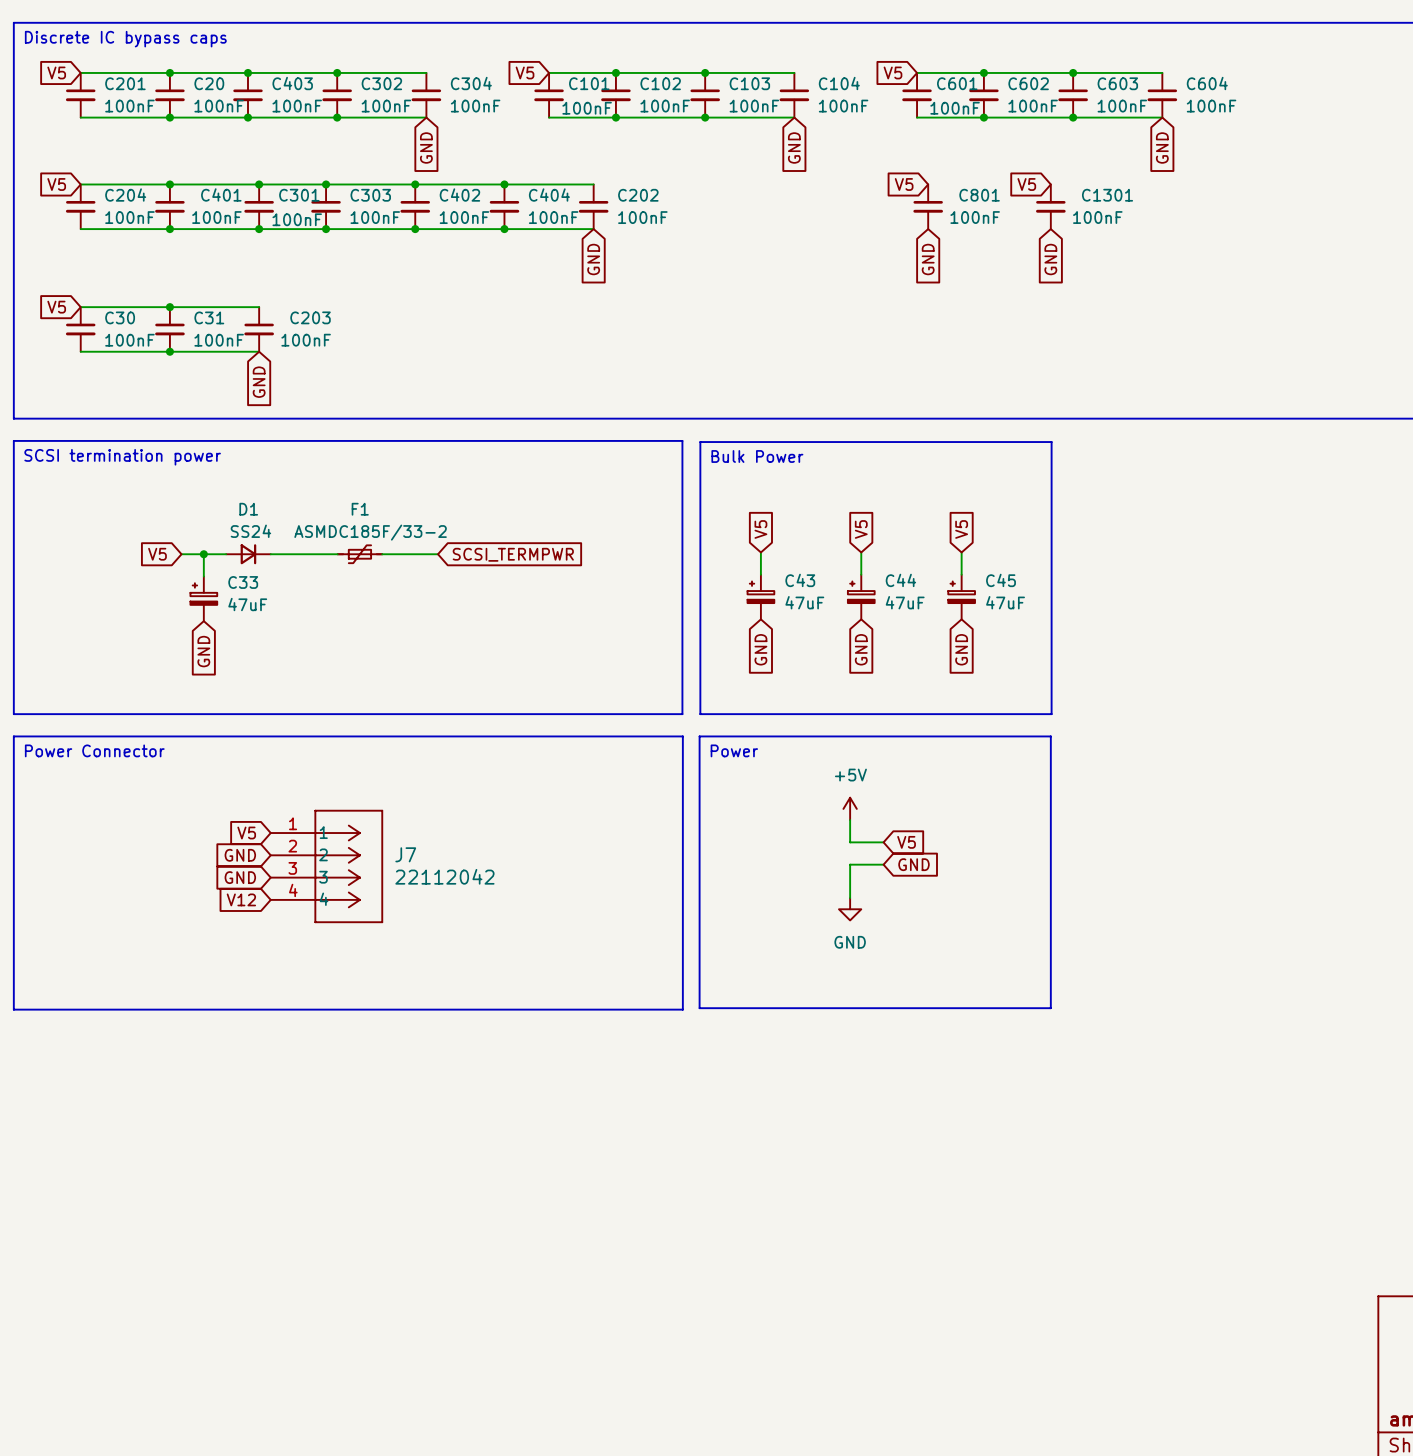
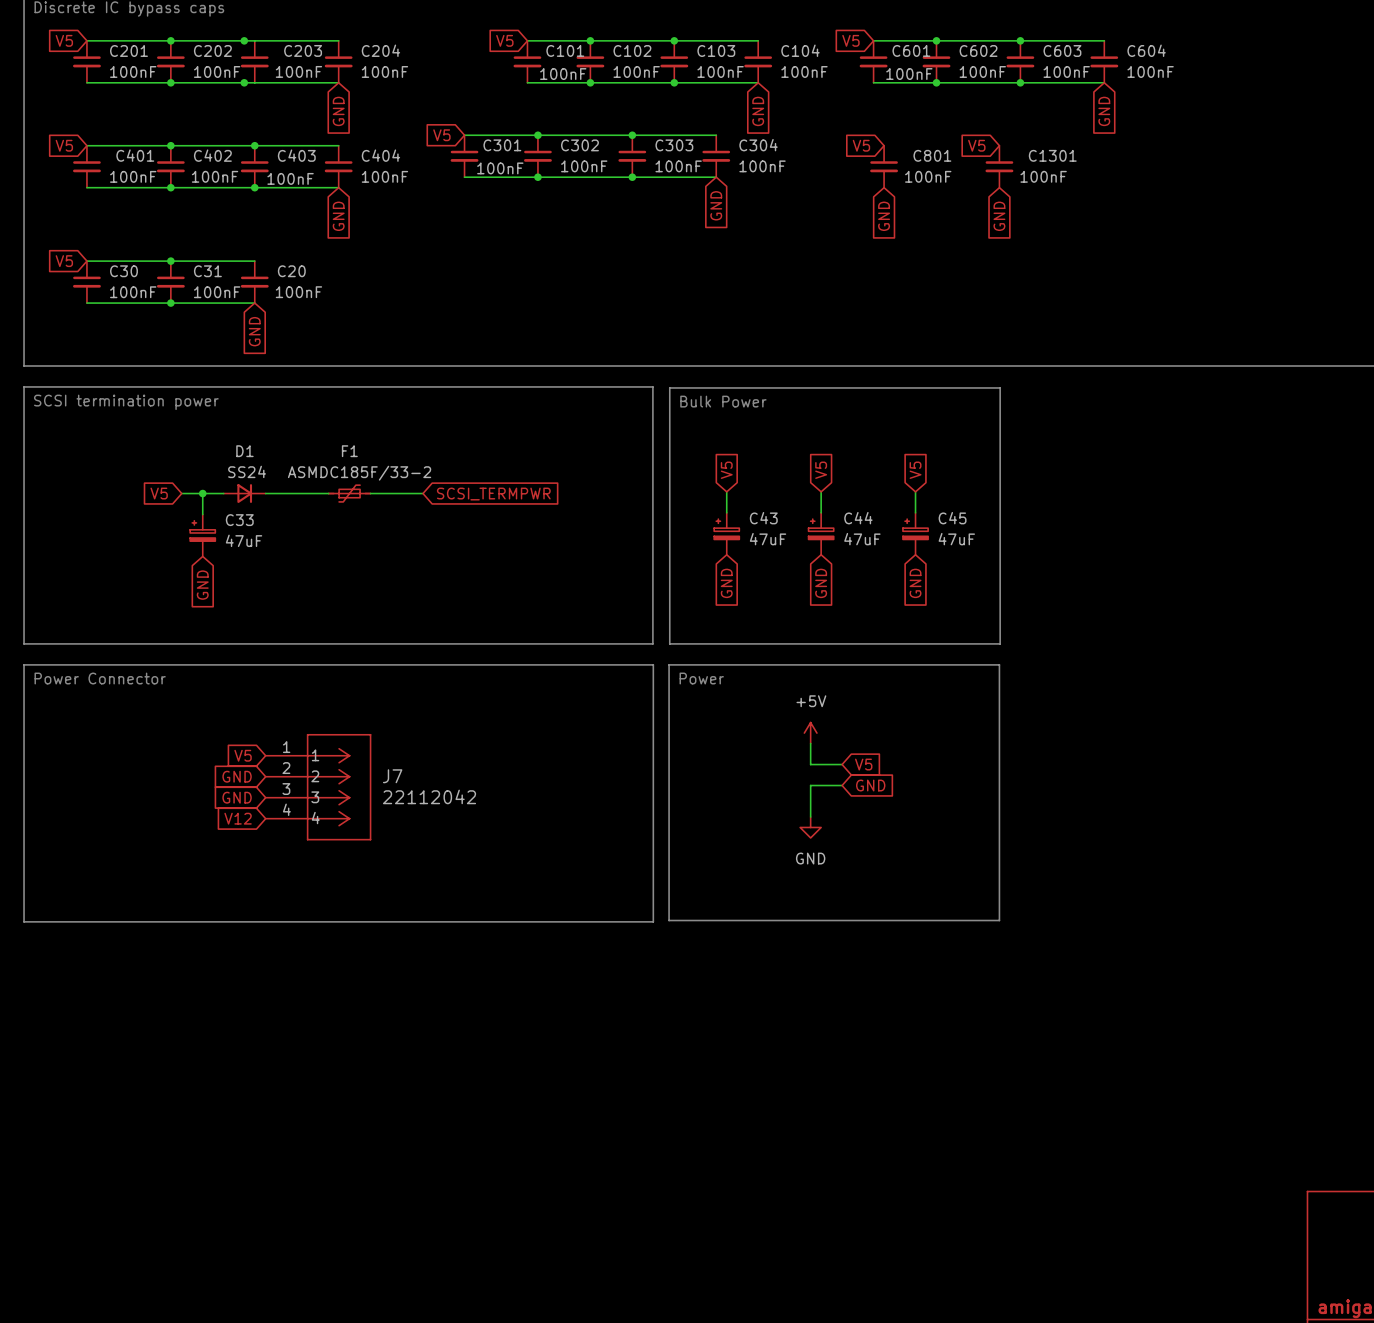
junction: (337, 72) -> none
wire: (348, 72) (426, 72) -> none
C20 name: C20 (209, 83) -> C202 (212, 51)
C403: 100nF (247, 95) -> none
C203: none -> 100nF (254, 61)
C302 position: (337, 95) -> (537, 156)
C204: none -> 100nF (338, 61)
C304 position: (426, 95) -> (716, 156)
junction: (337, 117) -> none
wire: (348, 117) (426, 117) -> none
global label: none -> GND (338, 111)
global label: GND (426, 148) -> none
global label: none -> V5 (441, 135)
wire: none -> (464, 135) (716, 135)
junction: none -> (537, 135)
junction: none -> (632, 135)
junction: (326, 184) -> none
wire: (348, 184) (593, 184) -> none
junction: (415, 184) -> none
junction: (504, 184) -> none
C401 name: C401 (221, 194) -> C402 (212, 155)
C204 name: C204 (125, 195) -> C401 (135, 155)
C301 name: C301 (299, 195) -> C403 (296, 155)
C301: none -> 100nF (464, 156)
C303 position: (326, 206) -> (632, 156)
C402: 100nF (415, 206) -> none
C404 position: (504, 206) -> (338, 166)
C202: 100nF (593, 206) -> none
wire: none -> (464, 177) (716, 177)
junction: none -> (537, 177)
junction: none -> (632, 177)
junction: (326, 229) -> none
wire: (348, 229) (593, 229) -> none
junction: (415, 229) -> none
junction: (504, 229) -> none
global label: none -> GND (716, 205)
global label: none -> GND (338, 216)
global label: GND (593, 259) -> none
C203 name: C203 (310, 317) -> C20 (291, 271)

